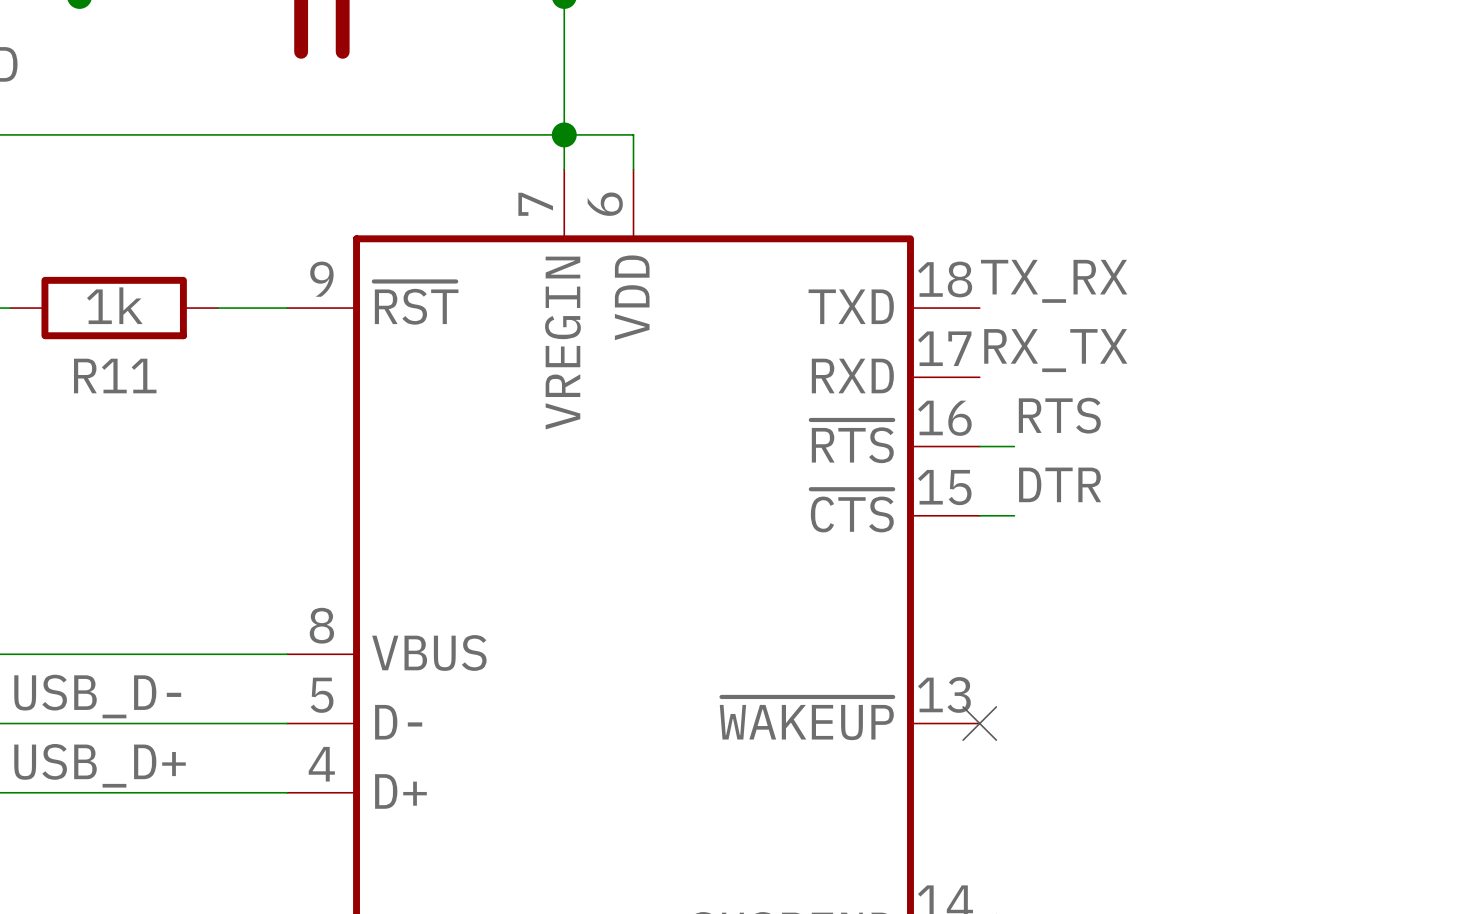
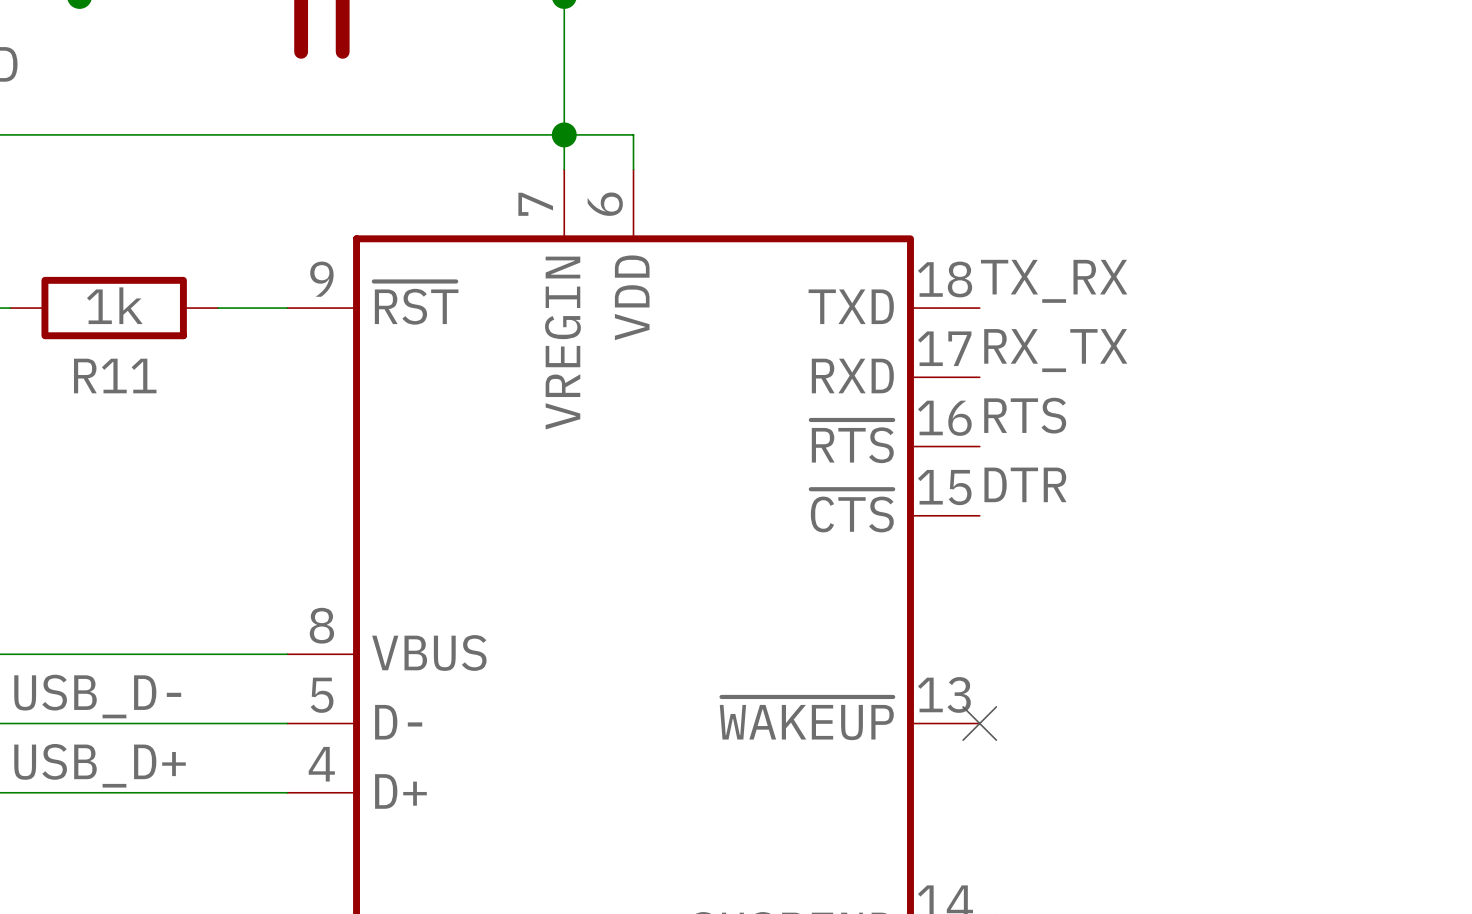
label position: RTS (1059, 415) -> RTS (1025, 415)
wire: (979, 446) (1014, 446) -> none
label position: DTR (1060, 484) -> DTR (1025, 484)
wire: (979, 515) (1014, 515) -> none

